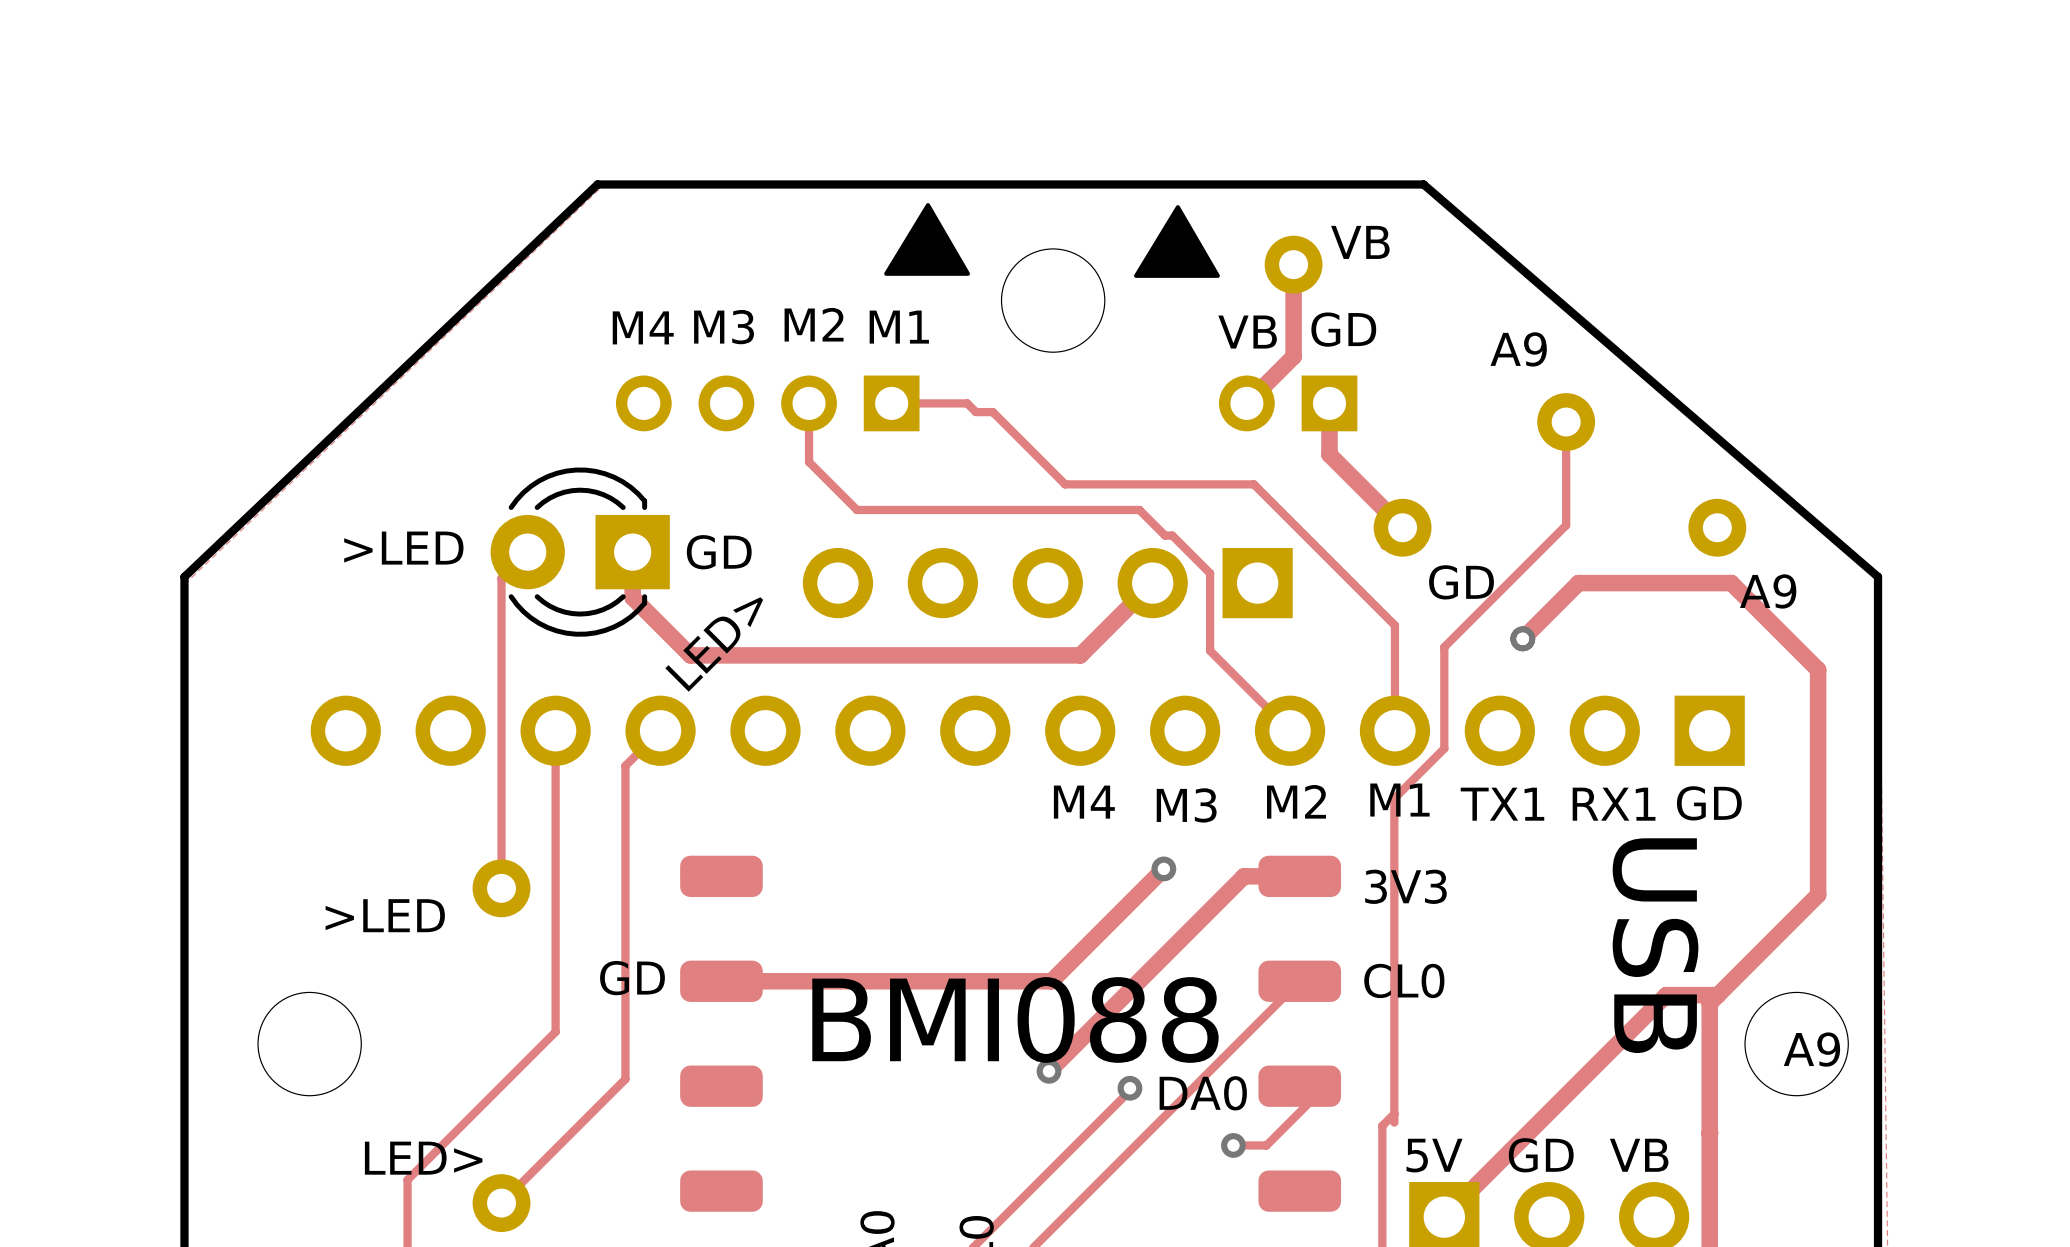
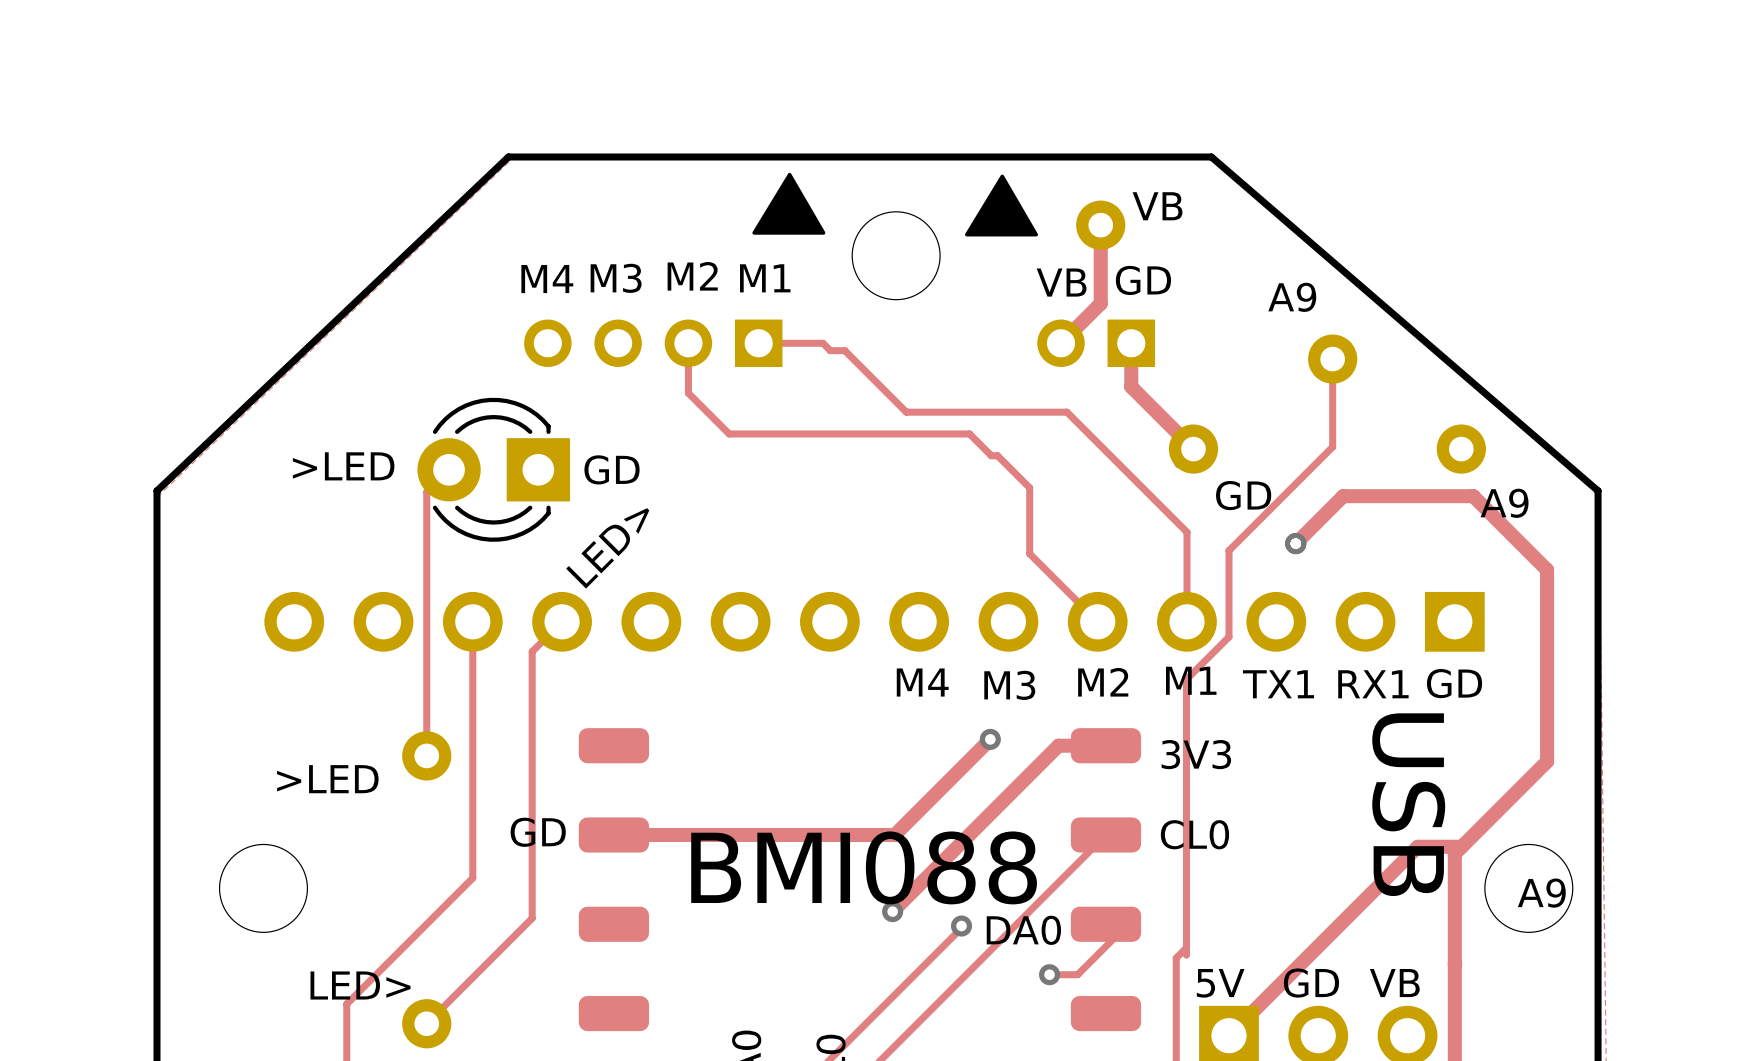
track: (632, 552) (632, 597) (690, 655) (1080, 655) (1152, 583) -> none
part: (1047, 583) -> none

